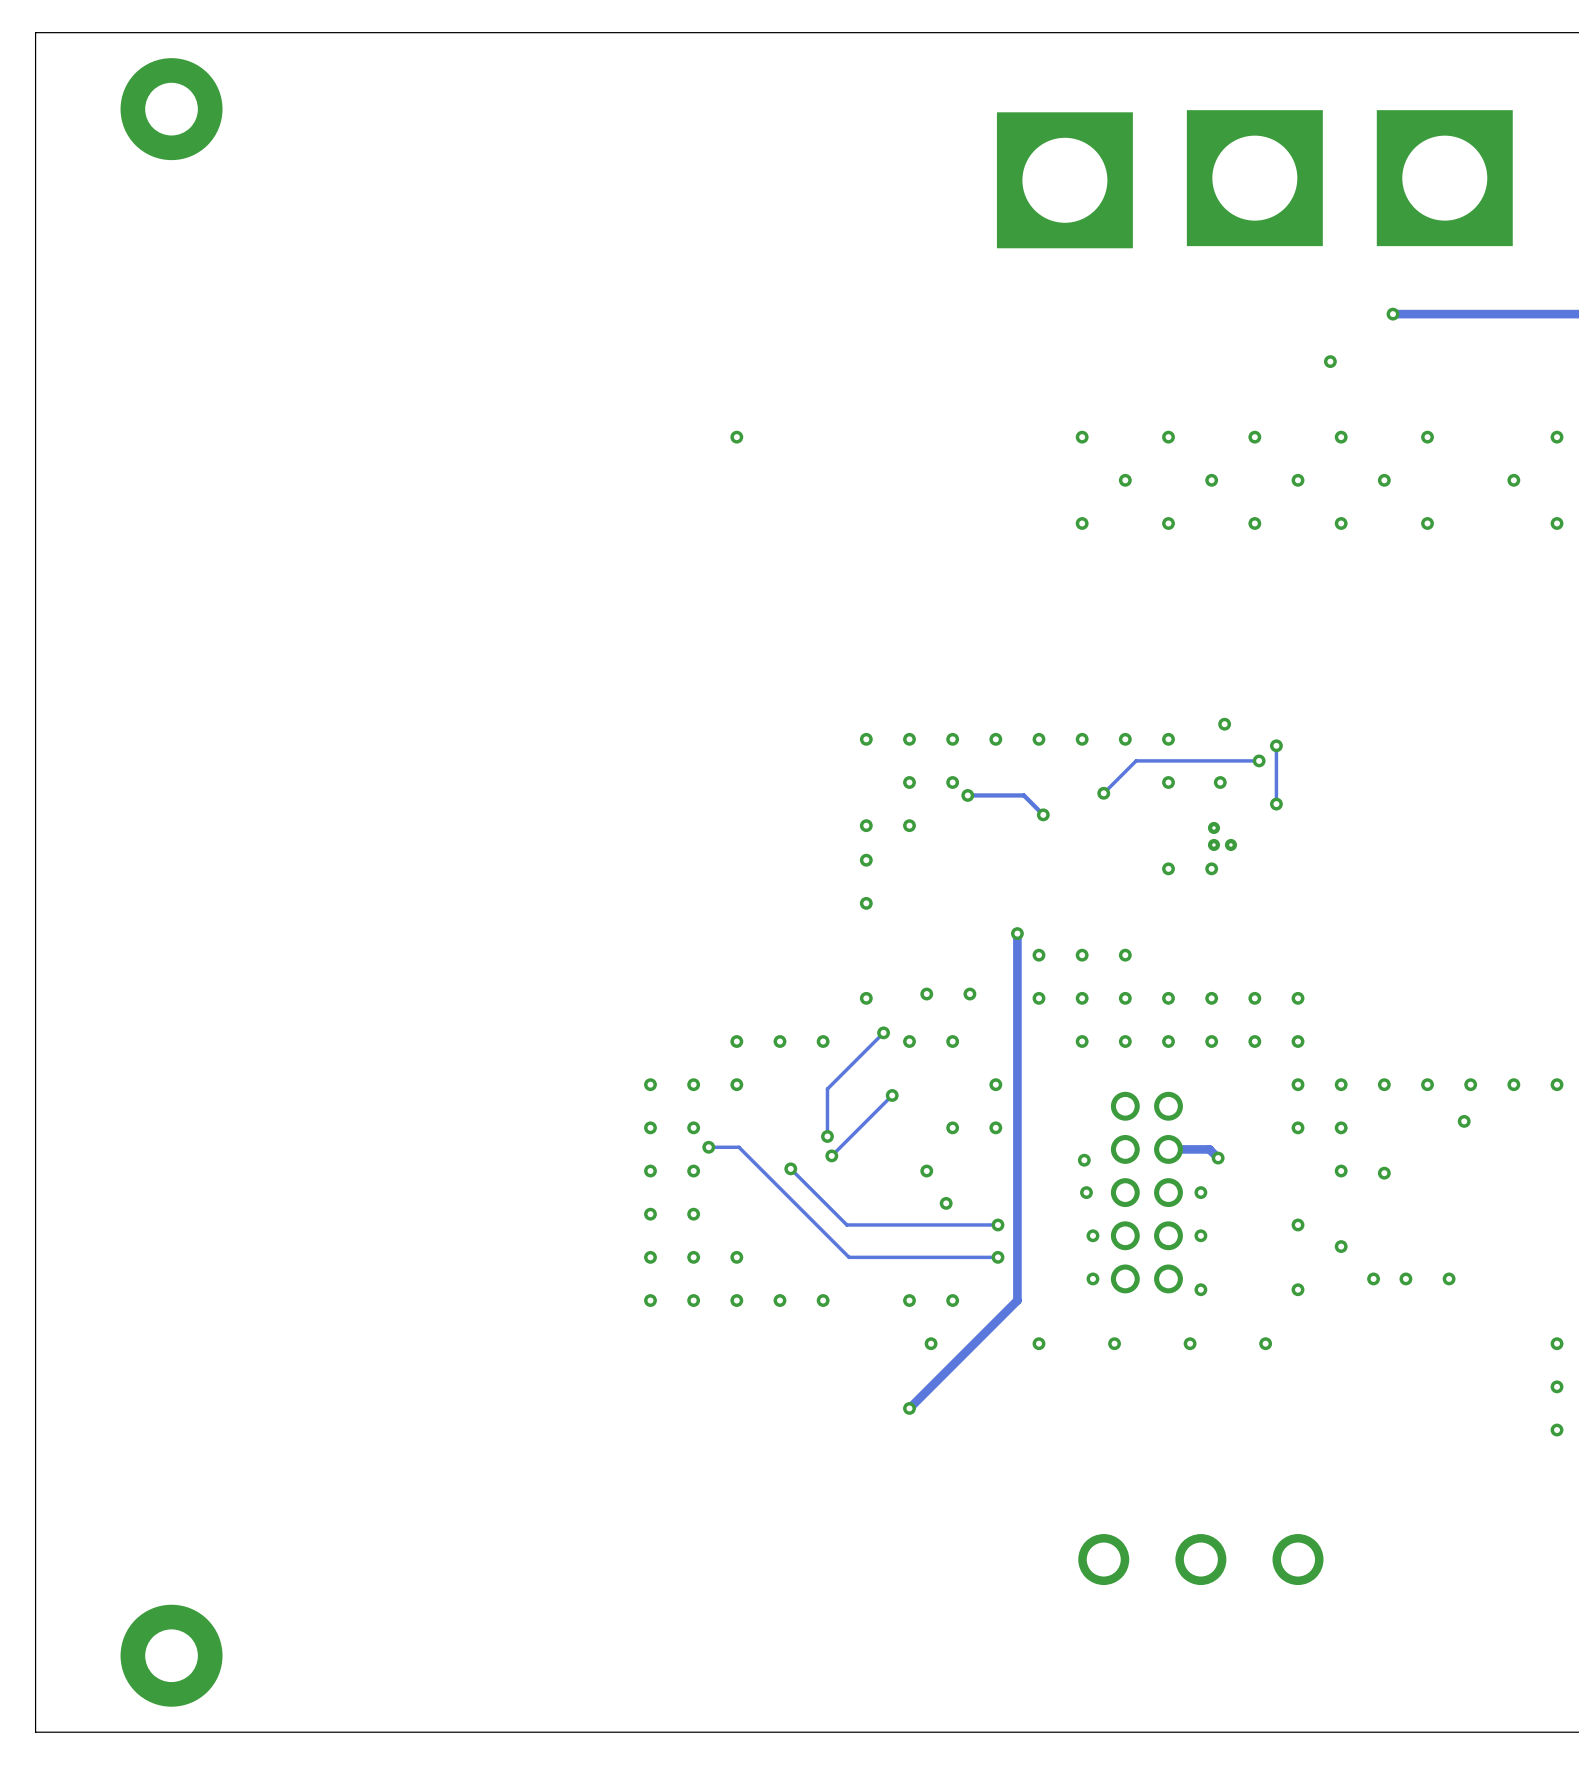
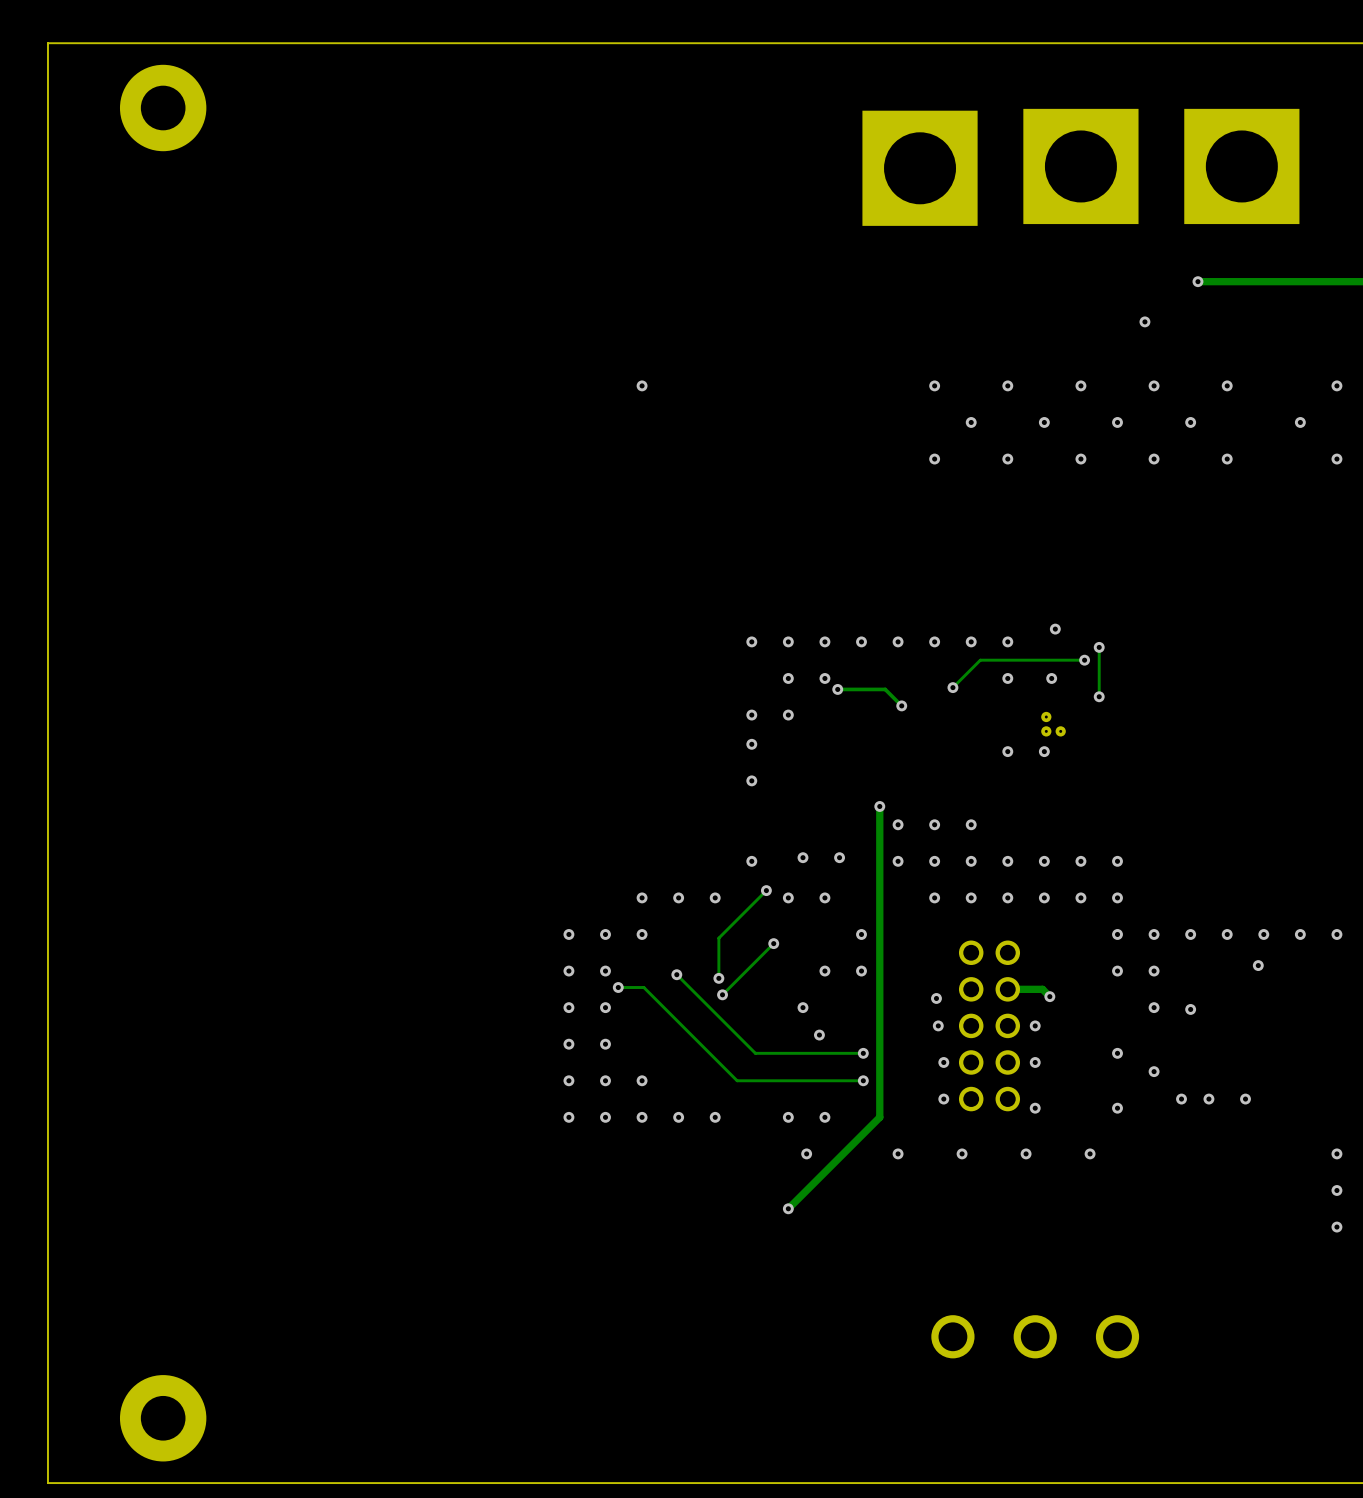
track: (790, 1168) (846, 1224) (870, 1224) -> (676, 974) (755, 1053)
via position: (790, 1168) -> (676, 974)

